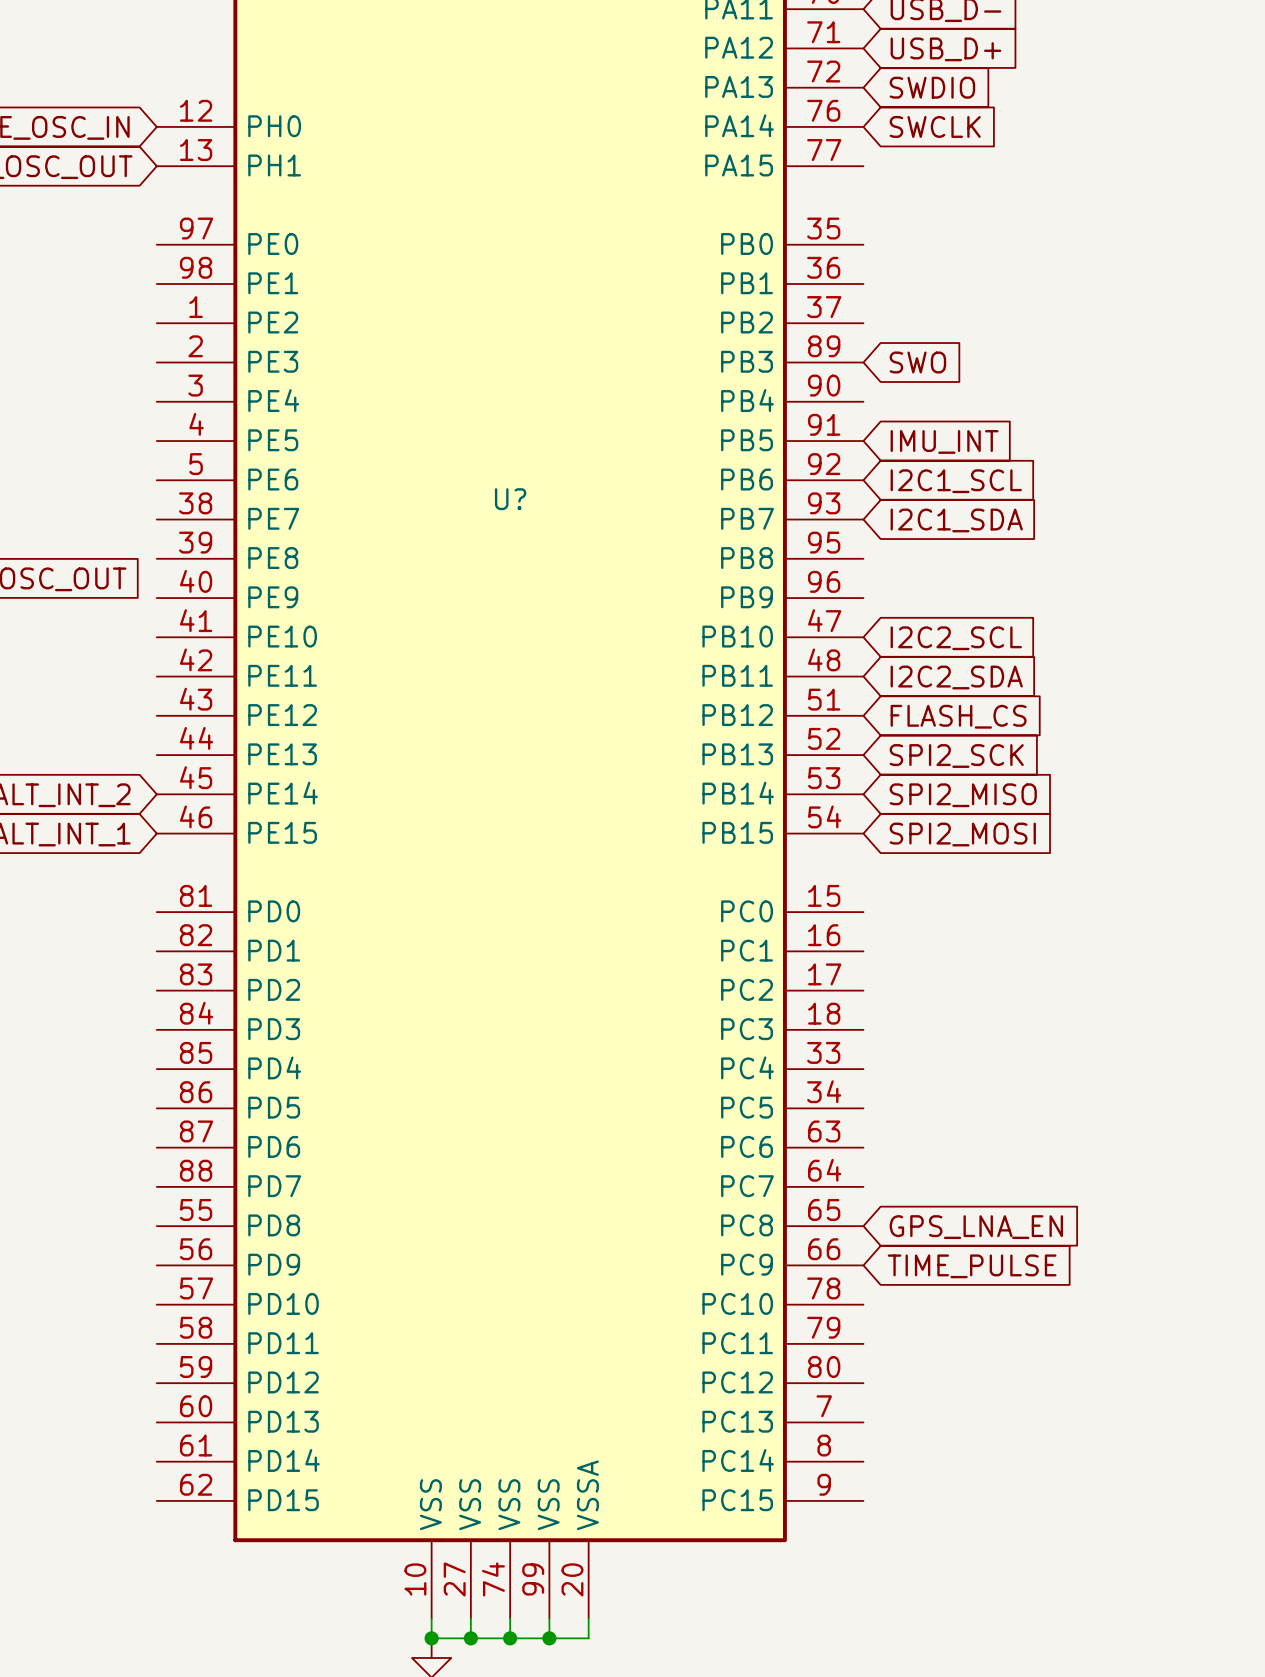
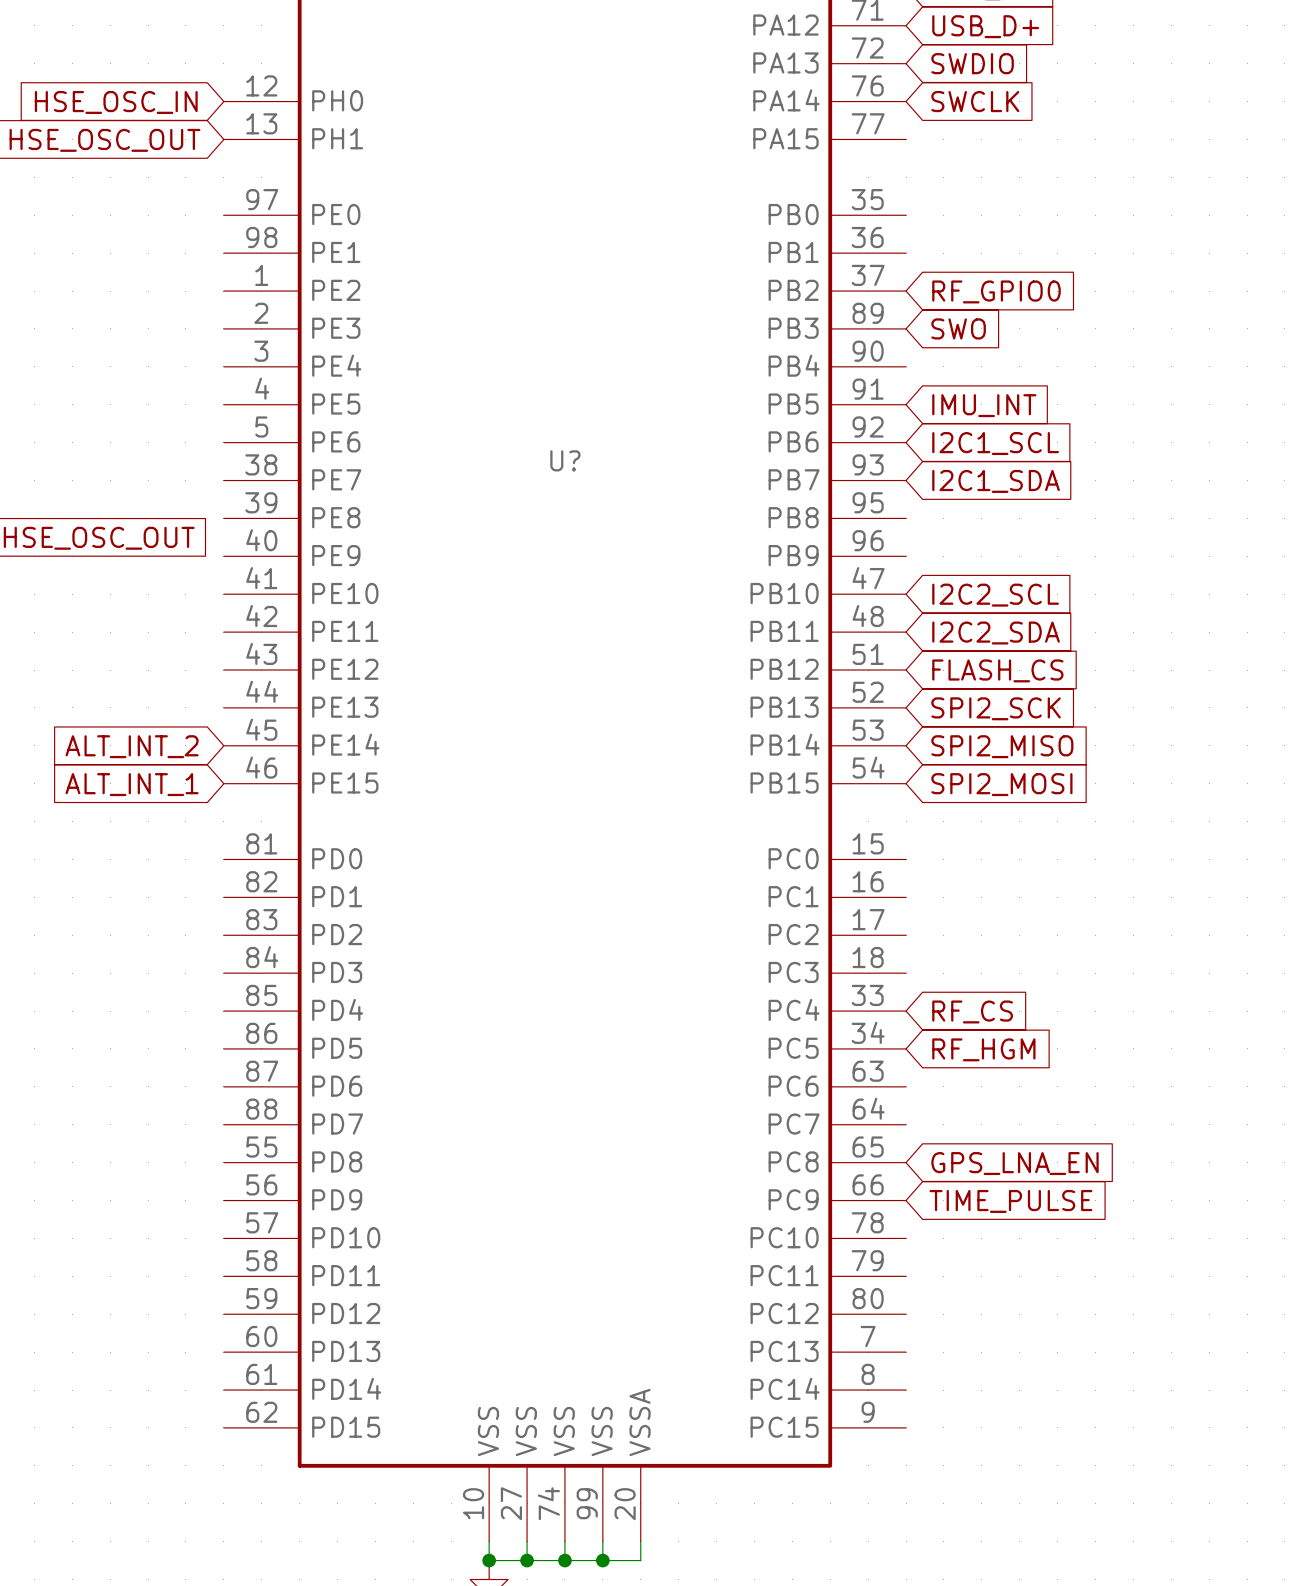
global label: none -> RF_GPIO0 (996, 291)
global label: none -> RF_CS (972, 1011)
global label: none -> RF_HGM (983, 1049)

